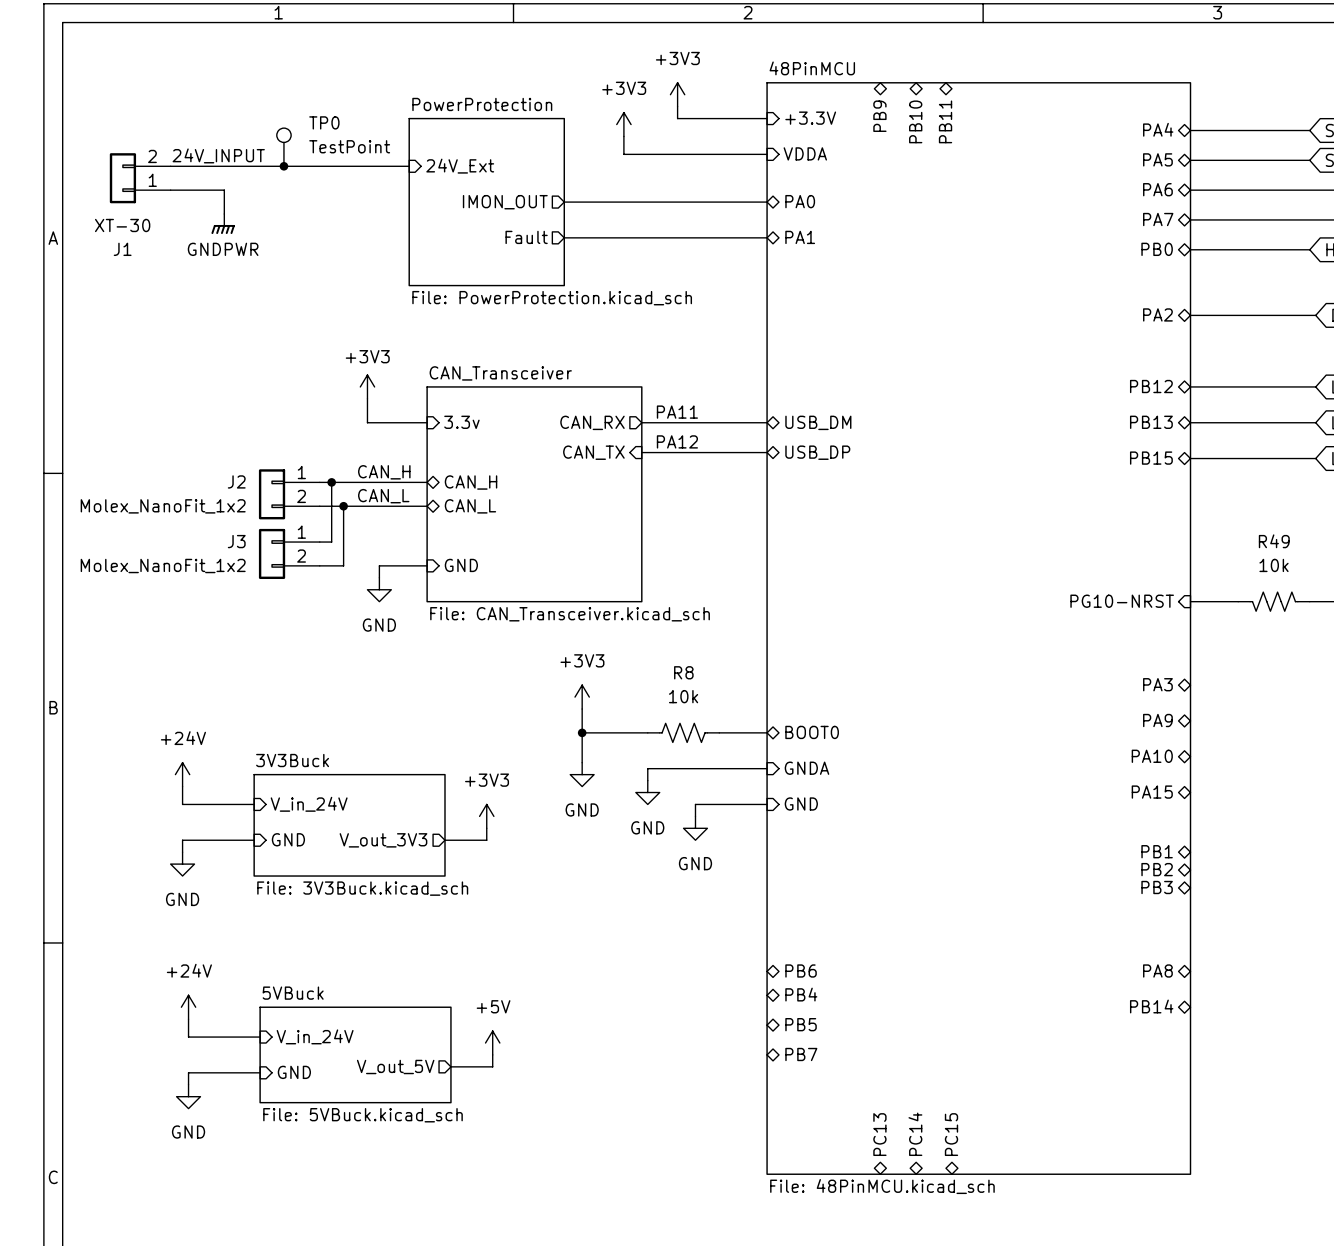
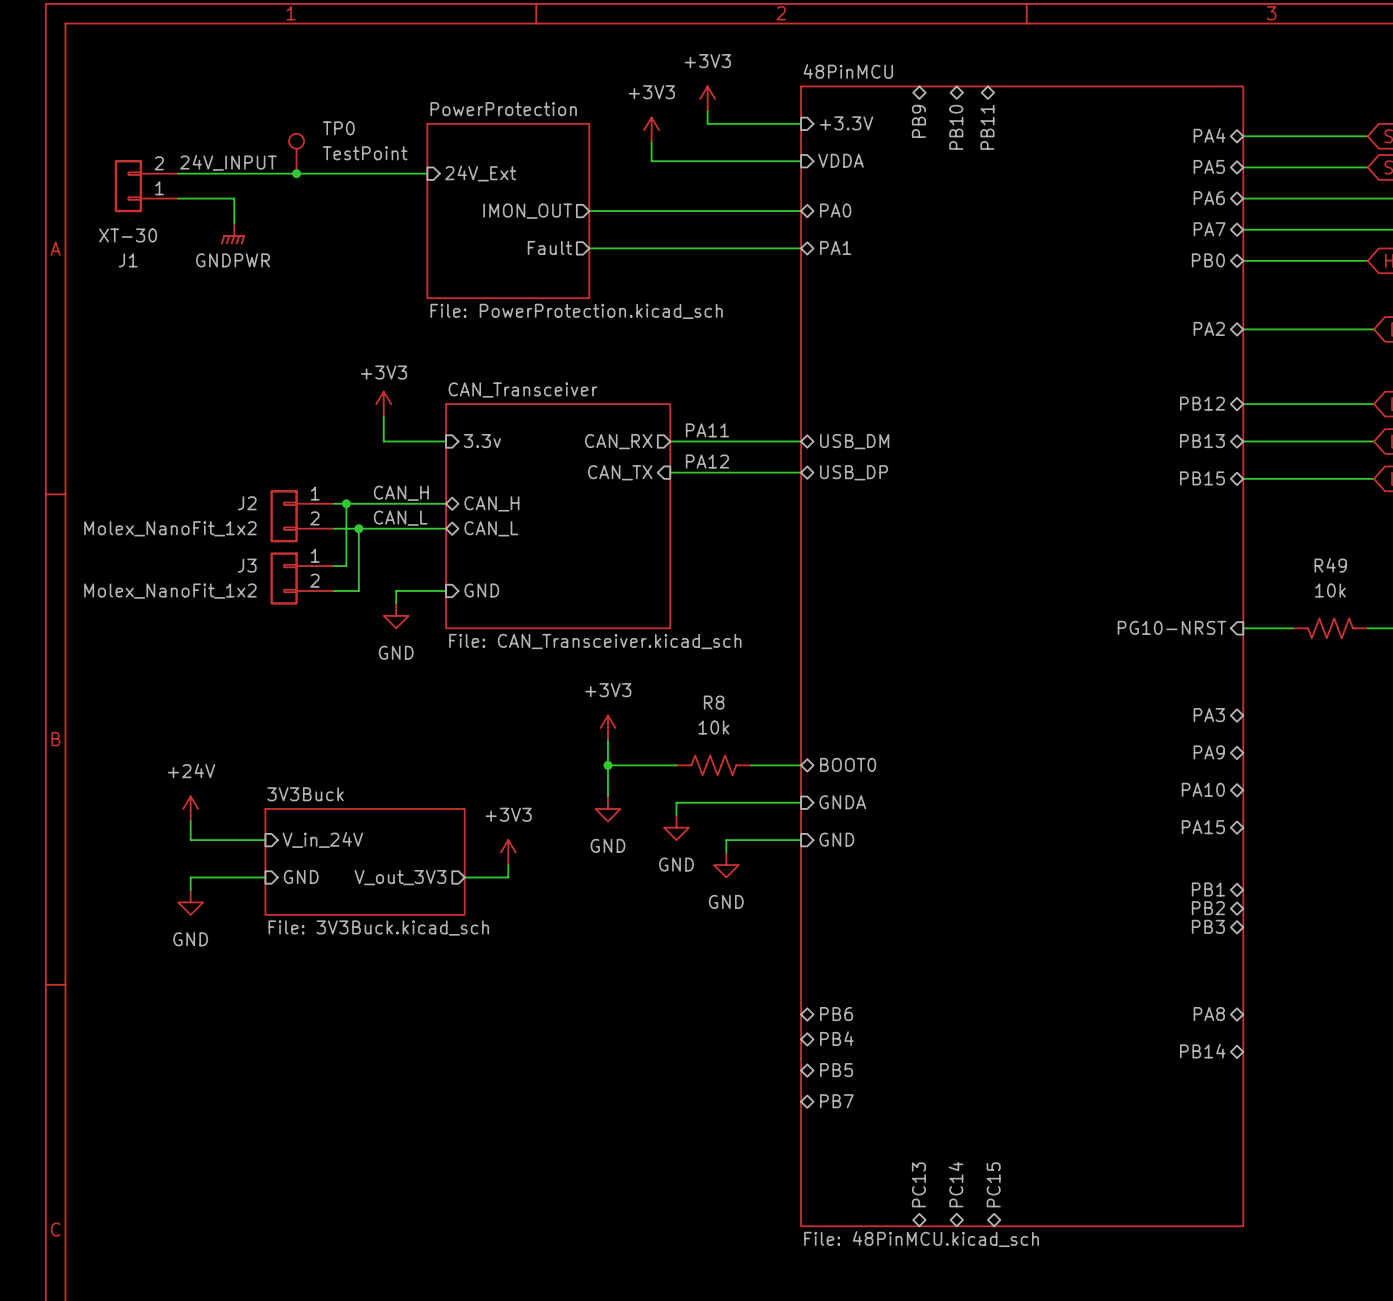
power symbol: +24V (188, 1007) -> none
wire: (188, 1019) (188, 1037) (260, 1037) -> none
sheet pin: V_in_24V (315, 1036) -> none
power symbol: +5V (492, 1043) -> none
sheet 5VBuck: File: 5VBuck.kicad_sch (355, 1054) -> none
wire: (492, 1054) (492, 1066) (450, 1066) -> none
sheet pin: V_out_5V (395, 1066) -> none
wire: (260, 1072) (188, 1072) (188, 1084) -> none
sheet pin: GND (294, 1072) -> none
power symbol: GND (188, 1096) -> none

